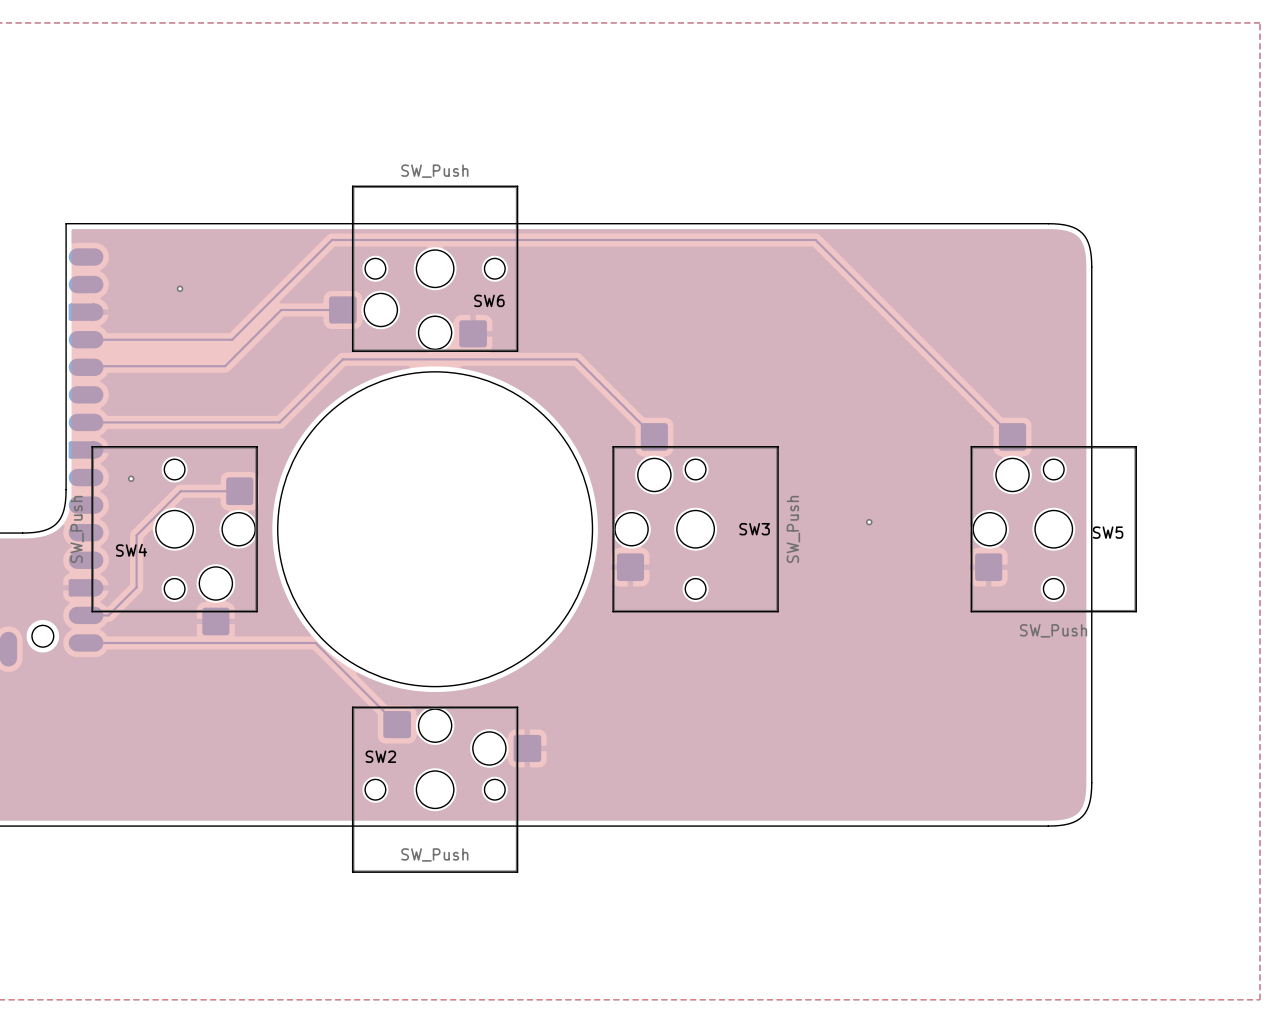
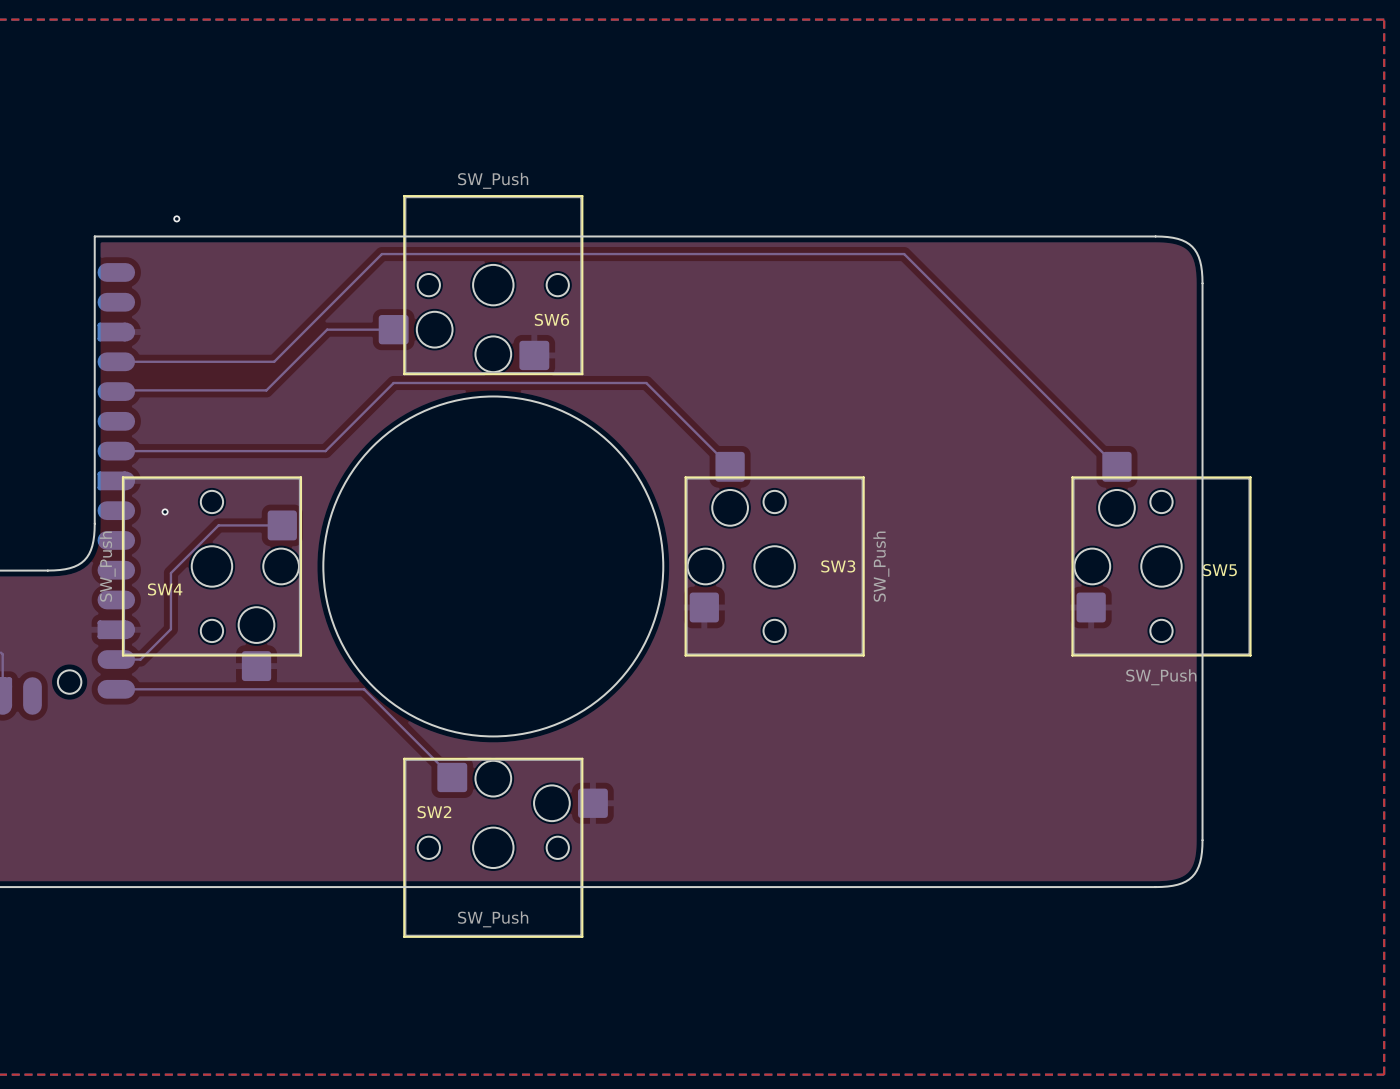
via: none -> (176, 218)
via: (180, 288) -> none
via: (869, 522) -> none

